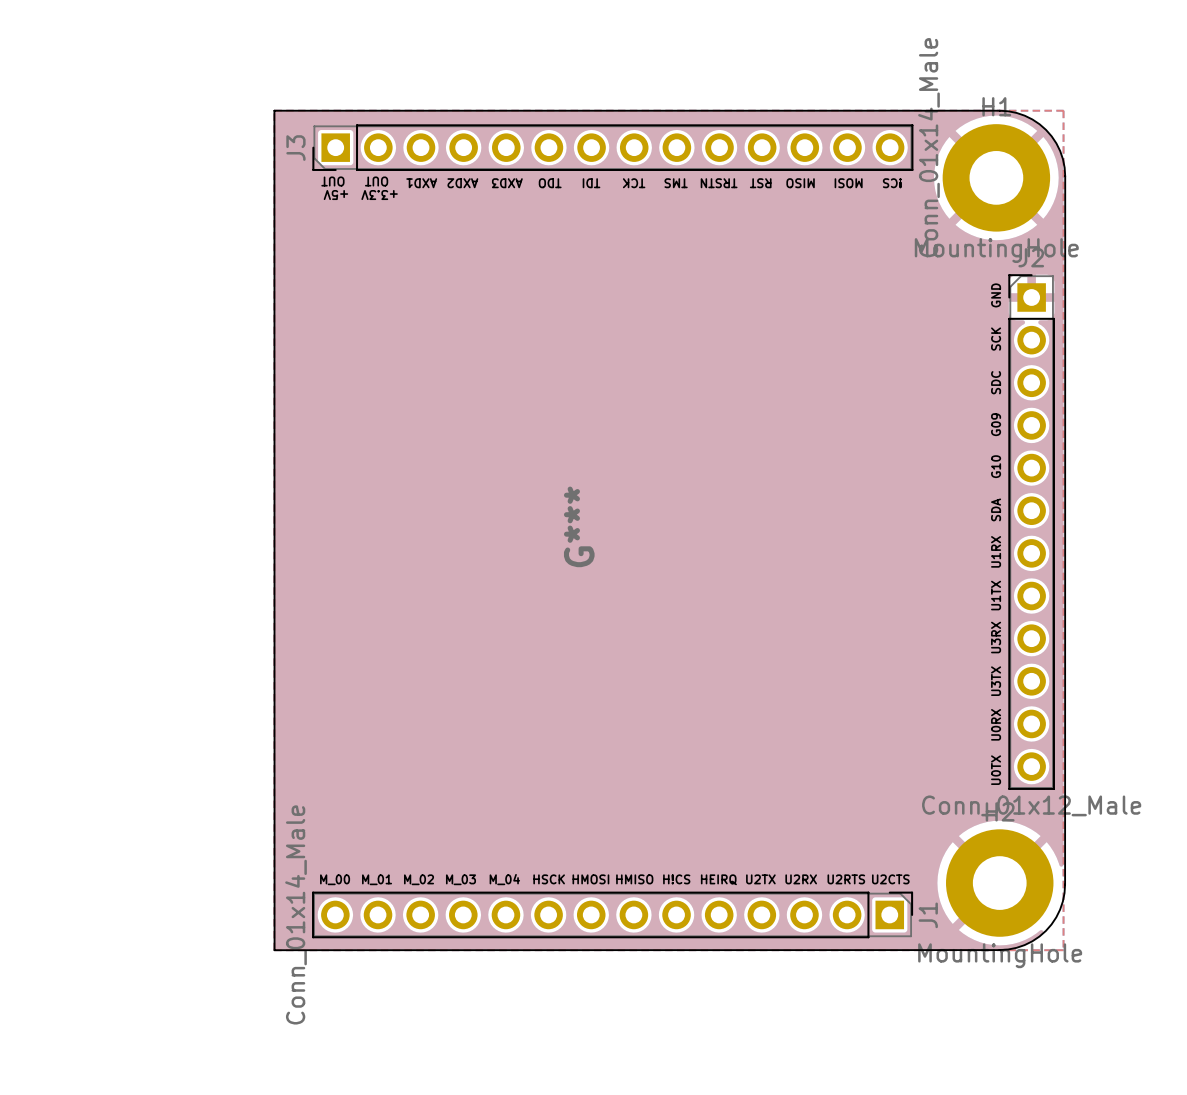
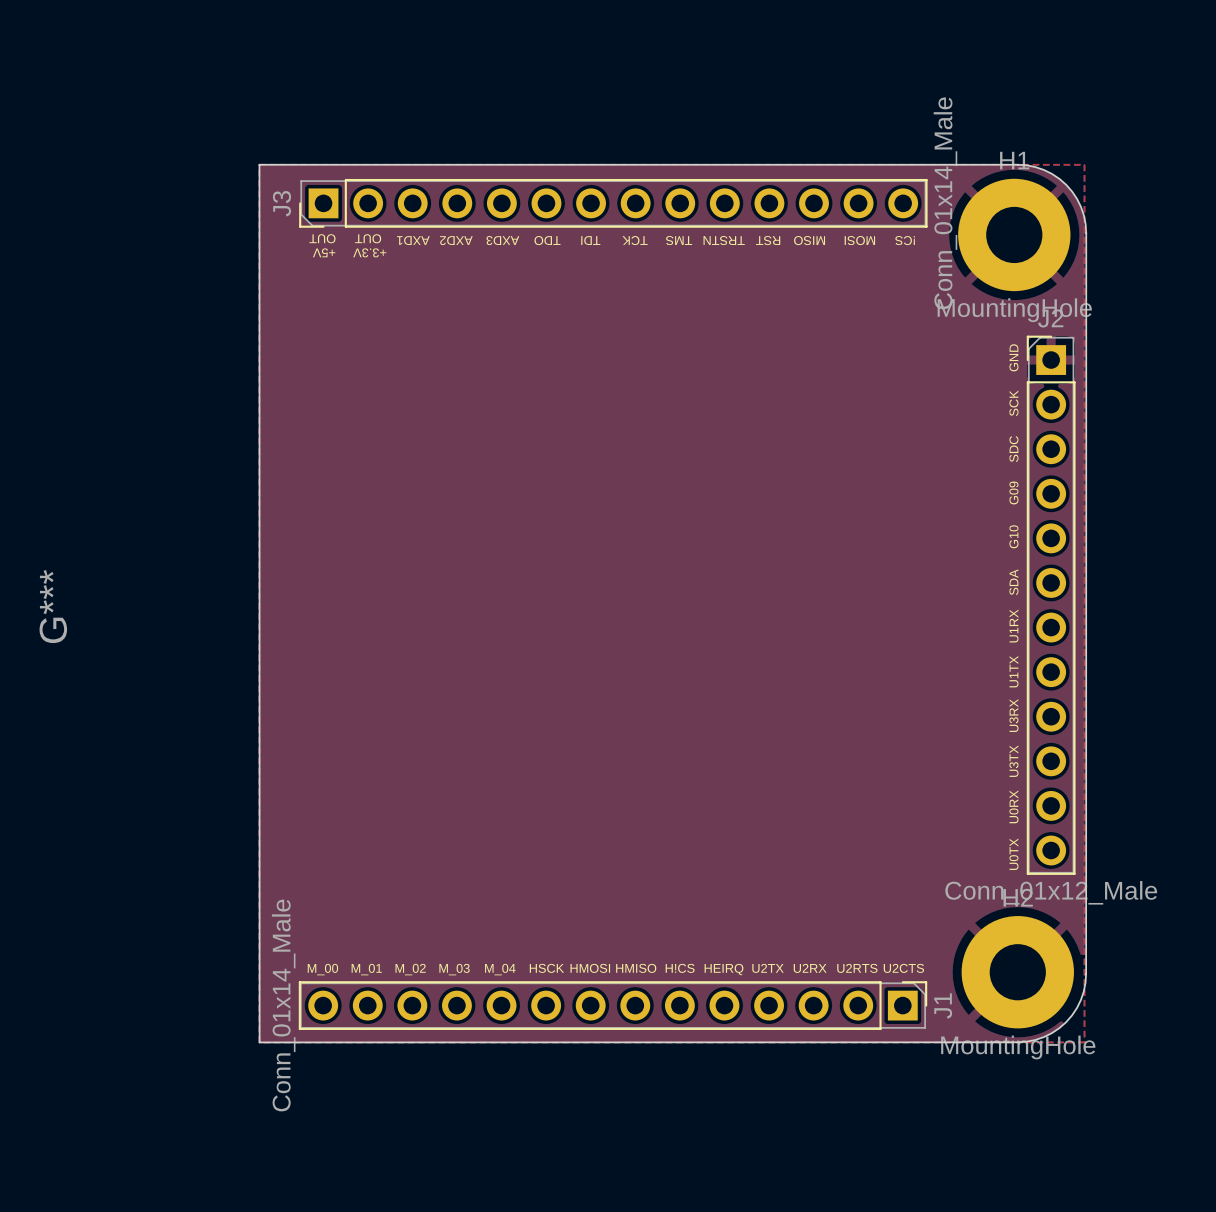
G***: (579, 526) -> none
G***: none -> (53, 606)

